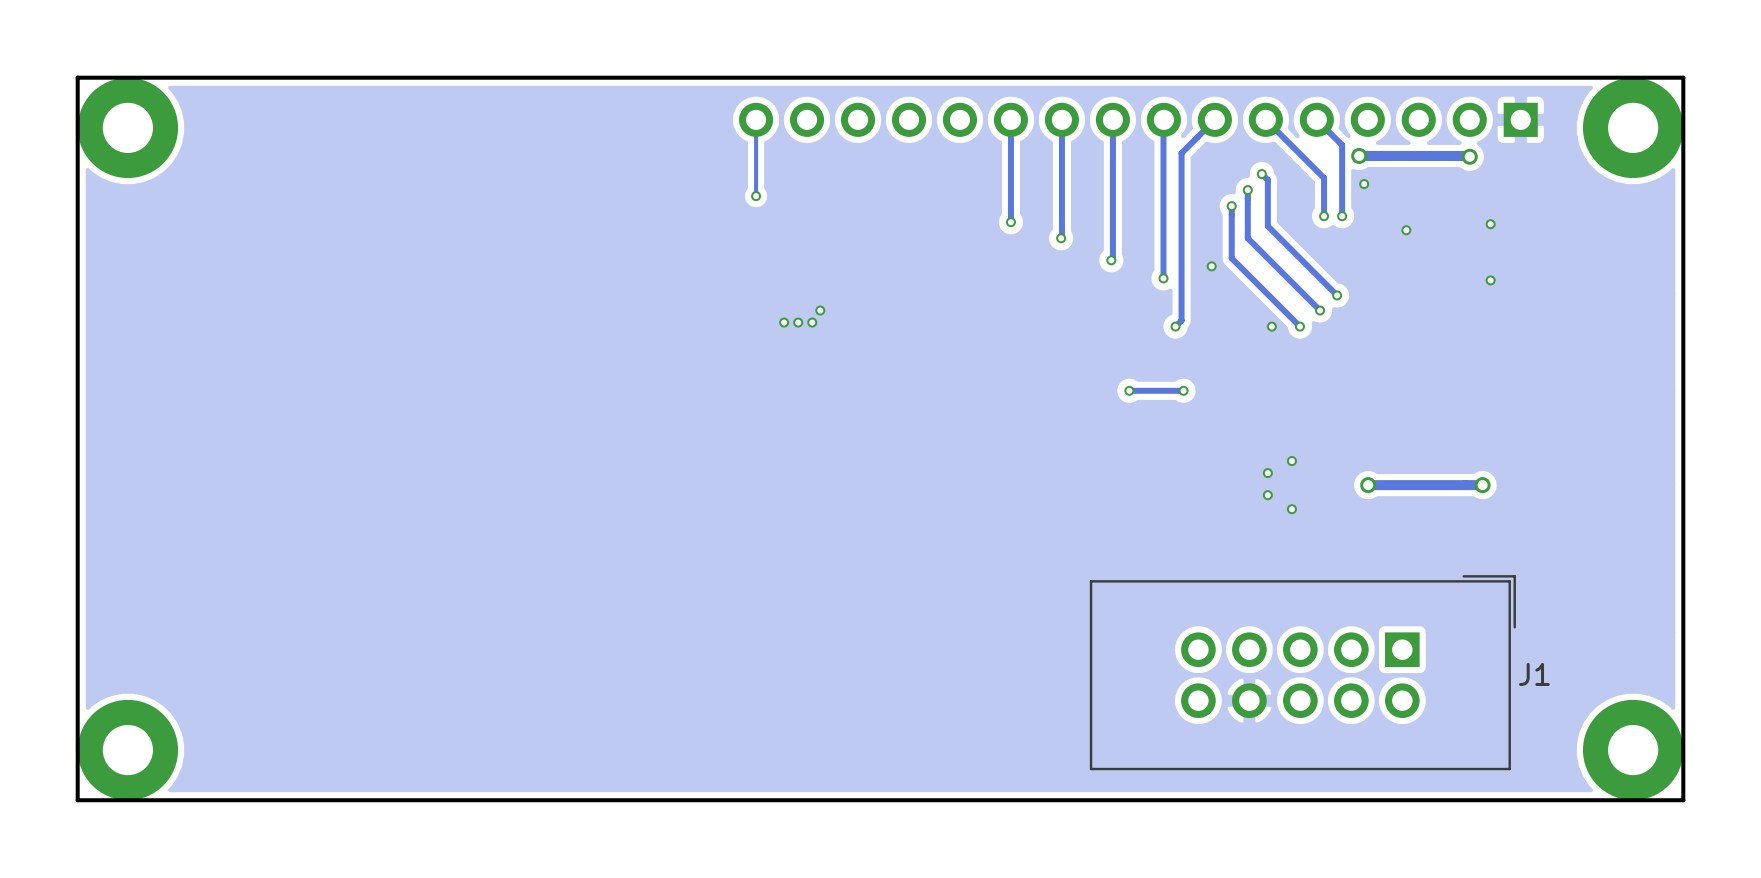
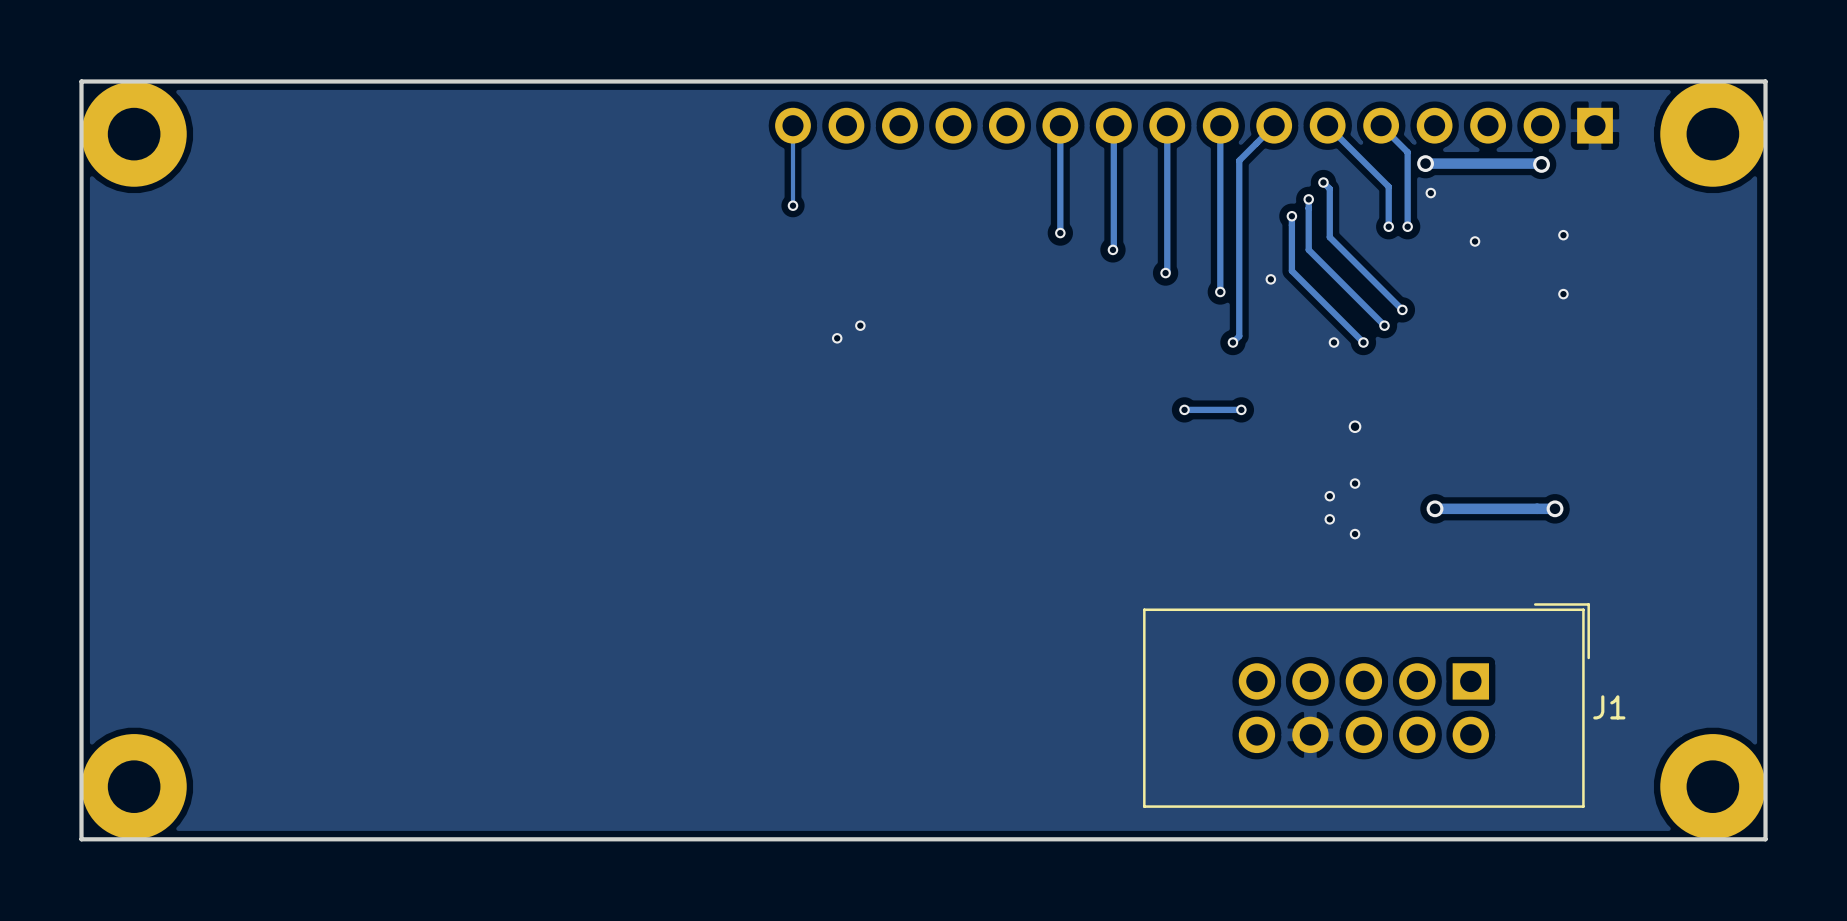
via: (784, 322) -> none
via: (812, 322) -> none
via: none -> (1355, 426)

